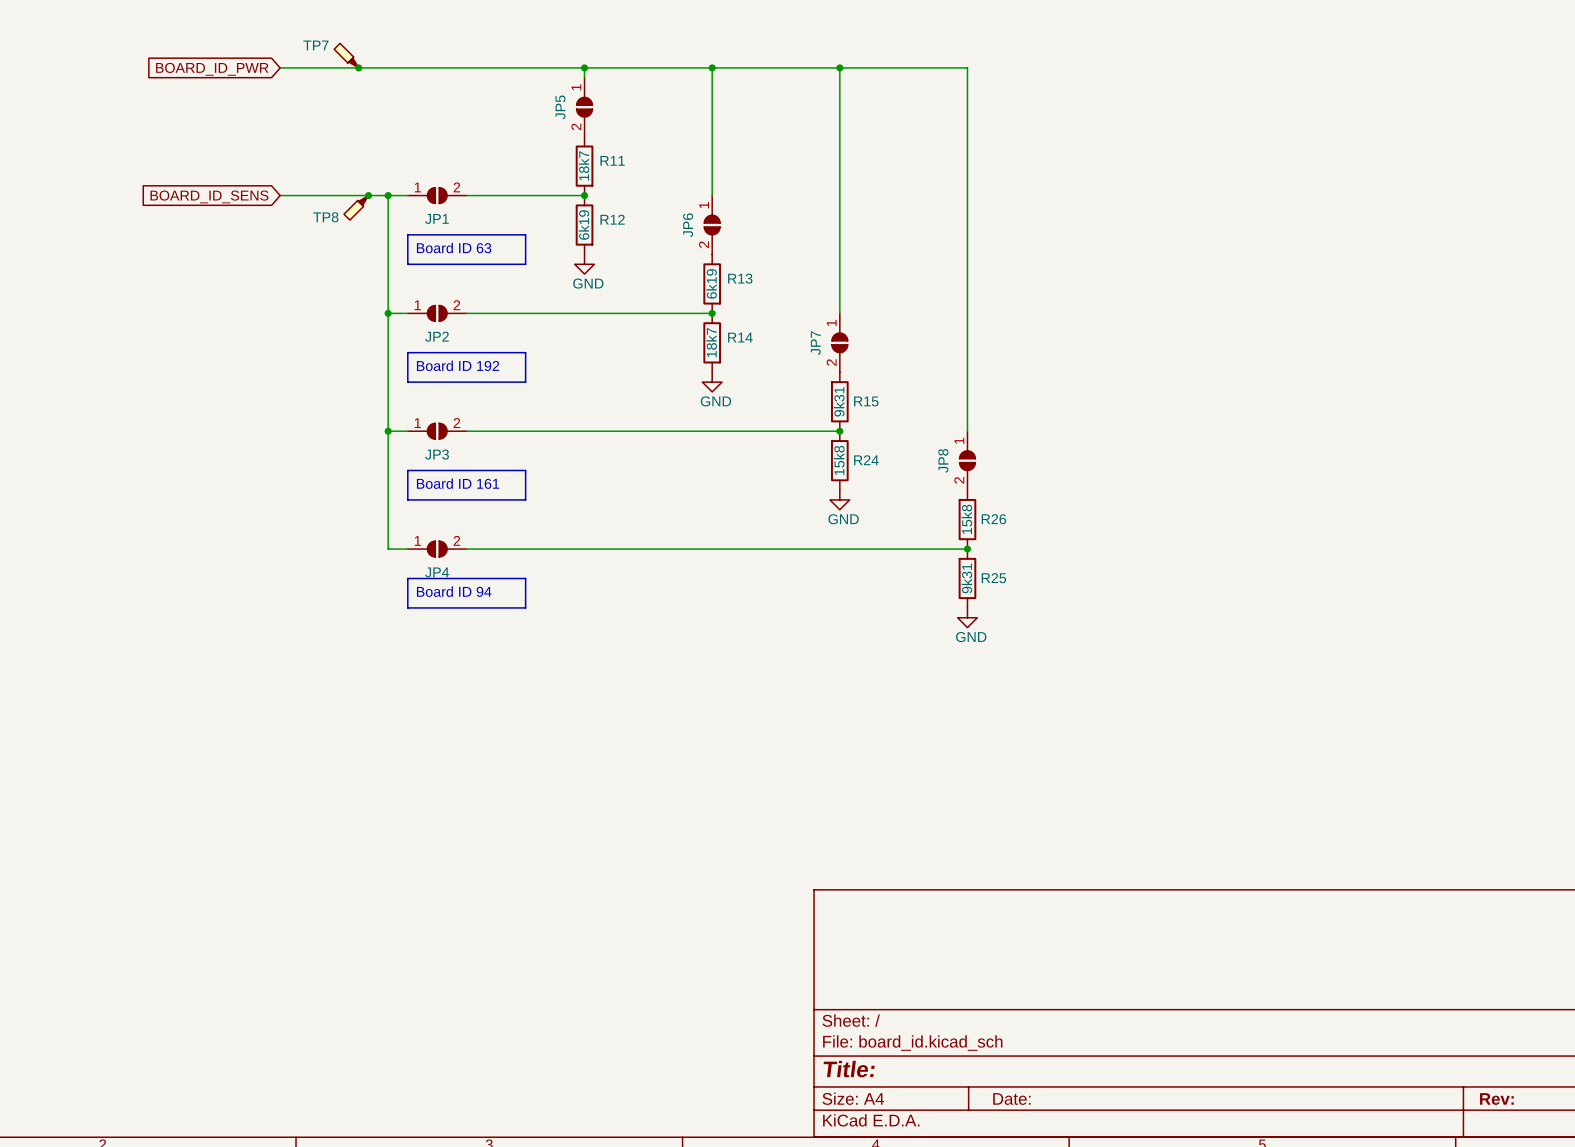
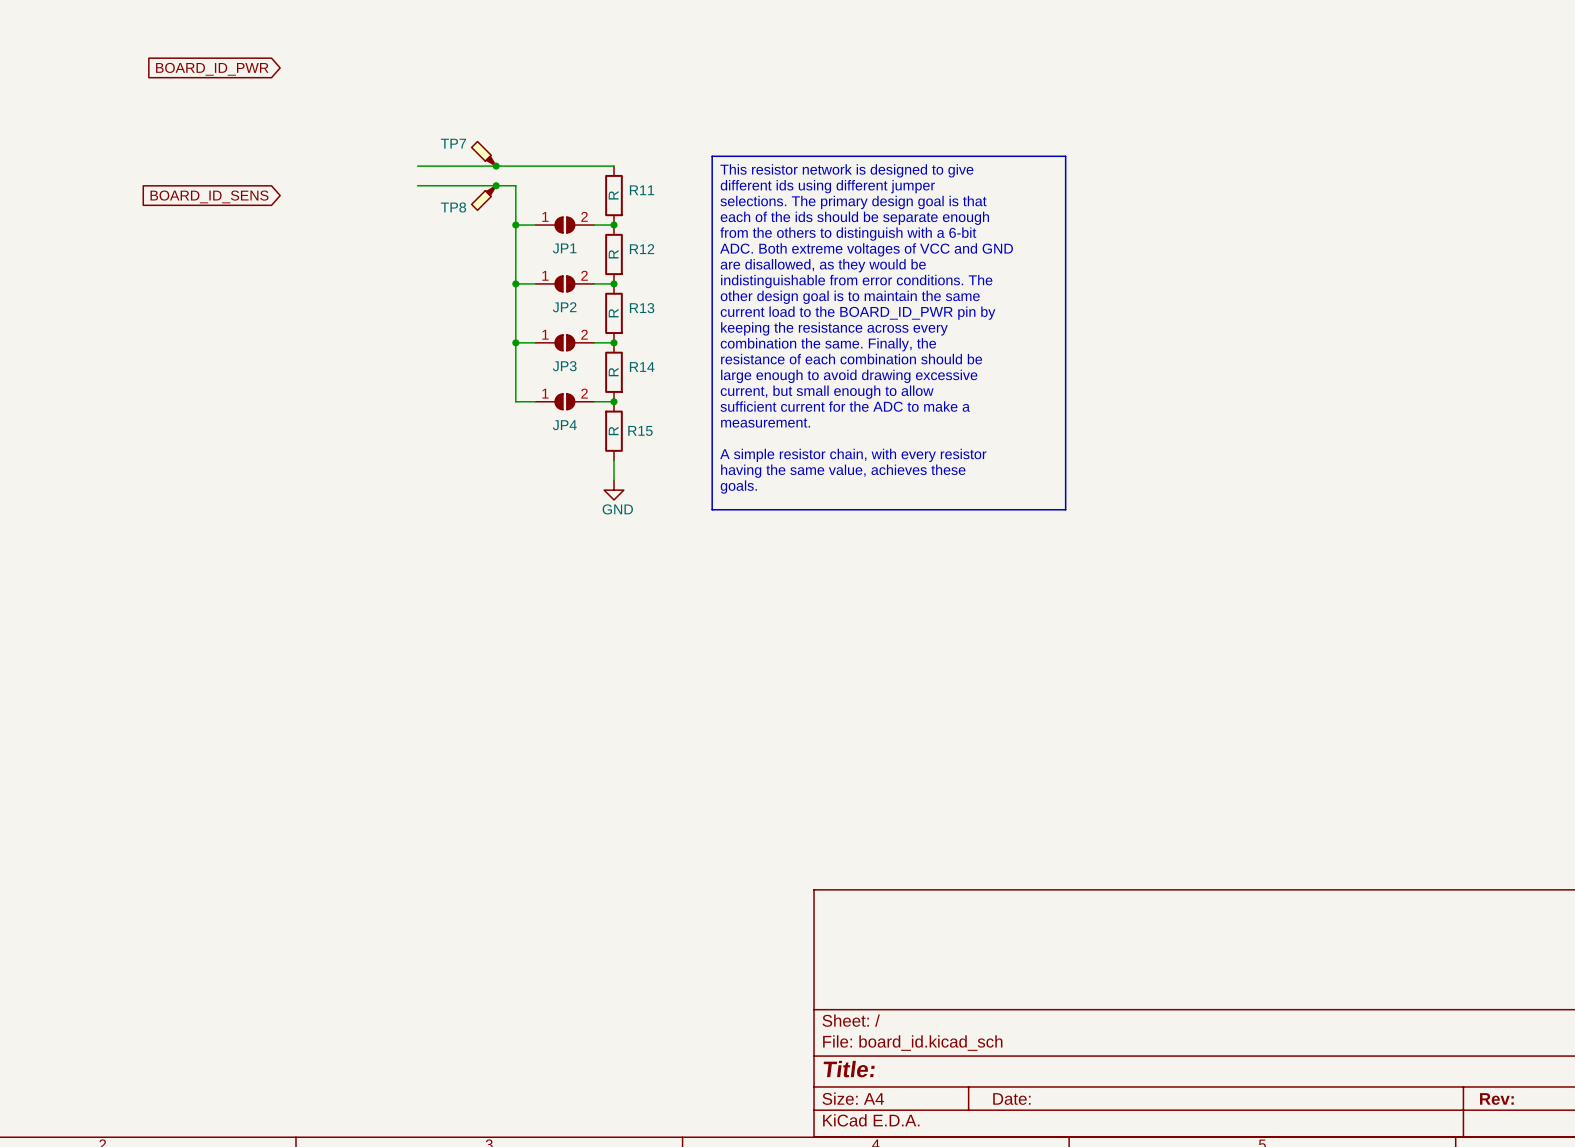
TP7 position: (346, 55) -> (483, 153)
wire: (280, 67) (967, 67) (967, 431) -> none
junction: (358, 67) -> none
wire: (584, 67) (584, 77) -> none
junction: (584, 67) -> none
wire: (712, 67) (712, 195) -> none
junction: (712, 67) -> none
wire: (839, 67) (839, 313) -> none
junction: (839, 67) -> none
JP5: (584, 107) -> none
line: none -> (712, 156) (1065, 156) (1065, 509) (712, 509) (712, 156)
R11 value: 18k7 (583, 165) -> R (613, 195)
wire: none -> (417, 166) (613, 166)
junction: none -> (496, 166)
R11 position: (584, 166) -> (613, 195)
text: none -> This resistor network is designed to give (846, 170)
wire: none -> (417, 185) (515, 185) (515, 401) (535, 401)
junction: none -> (496, 185)
text: none -> different ids using different jumper (827, 186)
wire: (280, 195) (407, 195) -> none
junction: (368, 195) -> none
wire: (388, 195) (388, 549) (407, 549) -> none
junction: (388, 195) -> none
JP1 position: (437, 195) -> (564, 225)
wire: (466, 195) (584, 195) -> none
junction: (584, 195) -> none
text: none -> selections. The primary design goal is that (853, 202)
TP8 position: (356, 207) -> (483, 198)
text: none -> each of the ids should be separate enough (854, 218)
junction: none -> (515, 225)
R12 value: 6k19 (583, 225) -> R (613, 254)
R12 position: (584, 225) -> (613, 254)
wire: none -> (594, 225) (613, 225)
junction: none -> (613, 225)
JP6: (712, 225) -> none
line: (407, 234) (525, 234) (525, 264) (407, 264) (407, 234) -> none
text: none -> from the others to distinguish with a 6-bit (848, 234)
text: Board ID 63 (454, 247) -> none
text: none -> ADC. Both extreme voltages of VCC and GND (866, 249)
power symbol: GND (584, 264) -> none
text: none -> are disallowed, as they would be (823, 265)
text: none -> indistinguishable from error conditions. The (856, 281)
wire: none -> (515, 283) (535, 283)
junction: none -> (515, 283)
wire: none -> (594, 283) (613, 283)
junction: none -> (613, 283)
R13 value: 6k19 (711, 283) -> R (613, 313)
R13 position: (712, 283) -> (613, 313)
text: none -> other design goal is to maintain the same (850, 297)
wire: (388, 313) (407, 313) -> (515, 225) (535, 225)
junction: (388, 313) -> none
JP2 position: (437, 313) -> (564, 283)
wire: (466, 313) (712, 313) -> none
junction: (712, 313) -> none
text: none -> current load to the BOARD_ID_PWR pin by (858, 313)
text: none -> keeping the resistance across every (834, 328)
junction: none -> (515, 342)
wire: none -> (594, 342) (613, 342)
junction: none -> (613, 342)
R14 value: 18k7 (711, 342) -> R (613, 372)
R14 position: (712, 342) -> (613, 372)
JP7: (839, 342) -> none
text: none -> combination the same. Finally, the (828, 344)
line: (407, 352) (407, 382) (525, 382) (525, 352) (407, 352) -> none
text: none -> resistance of each combination should be (851, 359)
text: Board ID 192 (458, 365) -> none
text: none -> large enough to avoid drawing excessive (849, 376)
power symbol: GND (712, 382) -> none
text: none -> current, but small enough to allow (827, 392)
wire: none -> (594, 401) (613, 401)
junction: none -> (613, 401)
R15 position: (839, 401) -> (613, 431)
R15 value: 9k31 (839, 401) -> R (613, 430)
text: none -> sufficient current for the ADC to make a (845, 406)
text: none -> measurement. (765, 422)
wire: (388, 431) (407, 431) -> (515, 342) (535, 342)
junction: (388, 431) -> none
JP3 position: (437, 431) -> (564, 342)
wire: (466, 431) (839, 431) -> none
junction: (839, 431) -> none
text: none -> A simple resistor chain, with every resistor (853, 455)
wire: none -> (613, 460) (613, 480)
R24: 15k8 (839, 460) -> none
JP8: (967, 460) -> none
line: (407, 470) (407, 499) (525, 499) (525, 470) (407, 470) -> none
text: none -> having the same value, achieves these (843, 471)
text: Board ID 161 (458, 483) -> none
text: none -> goals. (738, 487)
power symbol: none -> GND (613, 490)
power symbol: GND (839, 499) -> none
R26: 15k8 (967, 519) -> none
JP4 position: (437, 549) -> (564, 401)
wire: (466, 549) (967, 549) -> none
junction: (967, 549) -> none
line: (407, 578) (407, 607) (525, 607) (525, 578) (407, 578) -> none
R25: 9k31 (967, 578) -> none
text: Board ID 94 (454, 591) -> none
power symbol: GND (967, 617) -> none

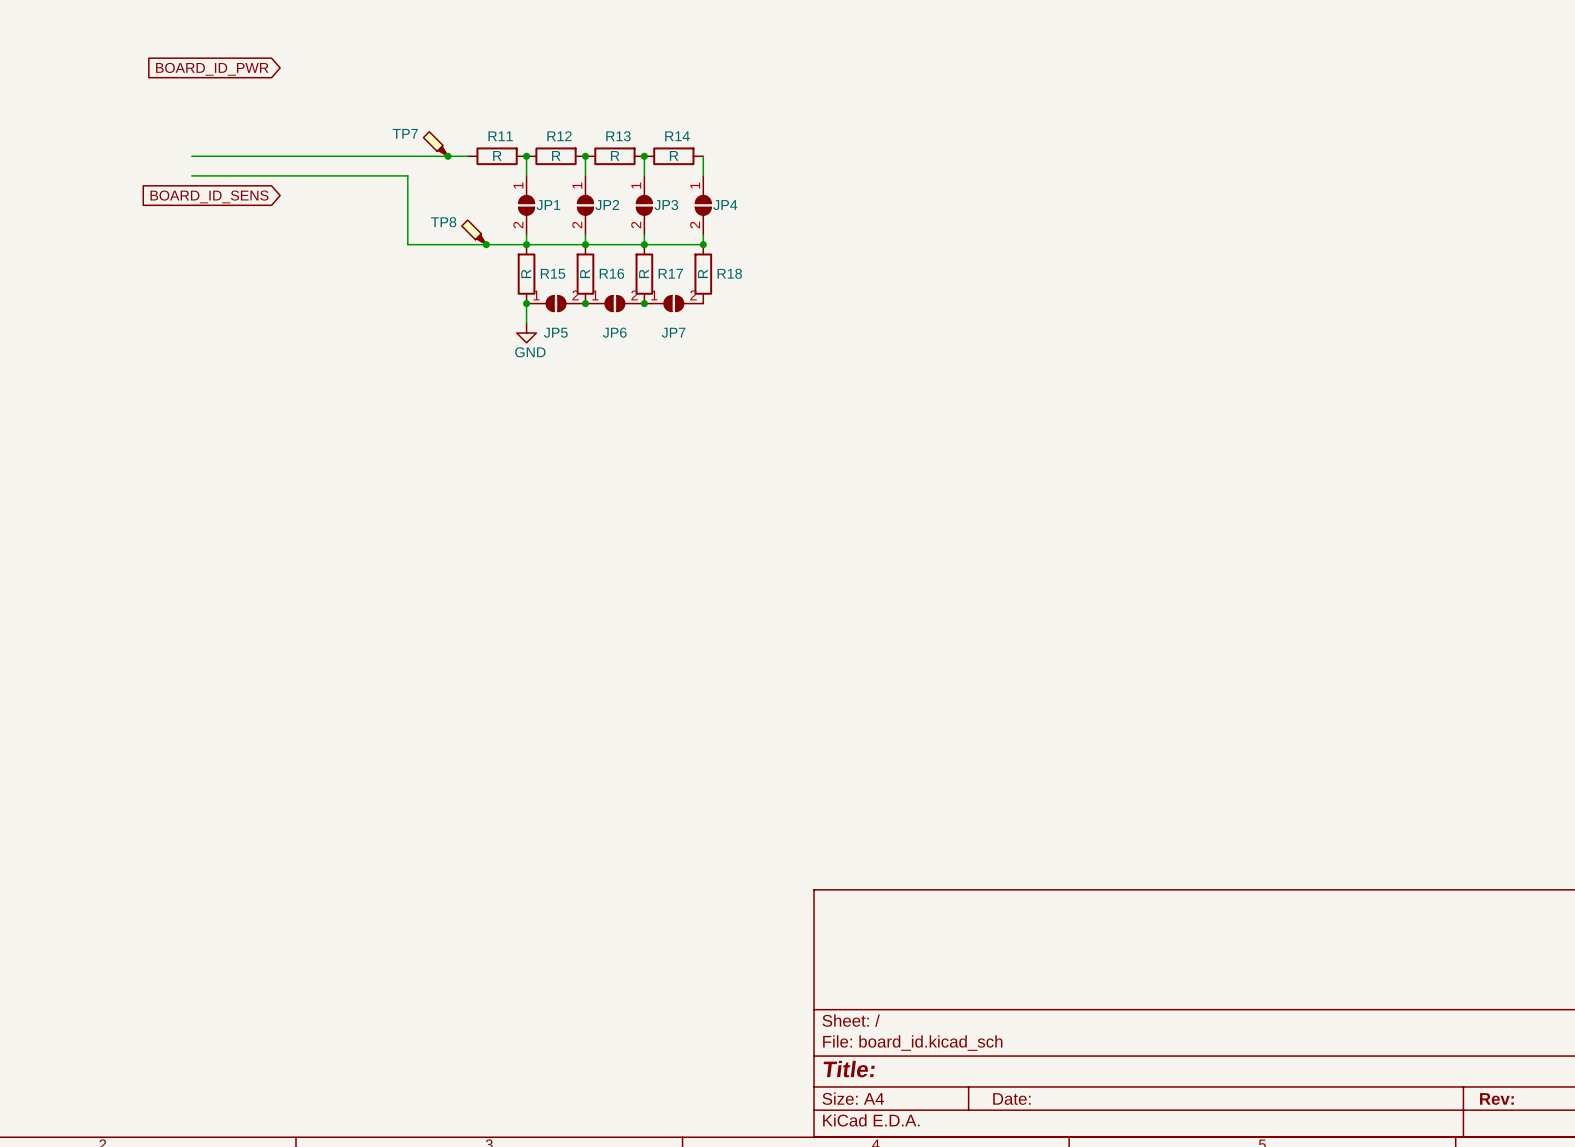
TP7 position: (483, 153) -> (435, 144)
wire: none -> (191, 156) (467, 156)
junction: none -> (448, 156)
wire: none -> (526, 156) (526, 175)
junction: none -> (526, 156)
wire: none -> (585, 156) (585, 175)
junction: none -> (585, 156)
wire: none -> (644, 156) (644, 175)
junction: none -> (644, 156)
wire: none -> (703, 156) (703, 175)
line: (712, 156) (1065, 156) (1065, 509) (712, 509) (712, 156) -> none
wire: (417, 166) (613, 166) -> none
junction: (496, 166) -> none
text: This resistor network is designed to give (846, 170) -> none
wire: none -> (191, 175) (407, 175) (407, 244) (703, 244) (703, 234)
wire: (417, 185) (515, 185) (515, 401) (535, 401) -> none
junction: (496, 185) -> none
text: different ids using different jumper (827, 186) -> none
R11 name position: R11 (642, 190) -> R11 (500, 136)
R11 rotation: 0° (613, 195) -> 90° clockwise (497, 156)
R11 position: (613, 195) -> (497, 156)
TP8 rotation: 0° (483, 198) -> 90° clockwise (474, 232)
TP8 position: (483, 198) -> (474, 232)
text: selections. The primary design goal is that (853, 202) -> none
TP8 name position: TP8 (453, 207) -> TP8 (443, 222)
text: each of the ids should be separate enough (854, 218) -> none
wire: (515, 225) (535, 225) -> none
junction: (515, 225) -> none
JP1 rotation: 0° (564, 225) -> 90° clockwise (526, 205)
JP1 position: (564, 225) -> (526, 205)
wire: (594, 225) (613, 225) -> none
junction: (613, 225) -> none
wire: none -> (526, 234) (526, 244)
wire: none -> (585, 234) (585, 244)
wire: none -> (644, 234) (644, 244)
text: from the others to distinguish with a 6-bit (848, 234) -> none
junction: none -> (486, 244)
junction: none -> (526, 244)
junction: none -> (585, 244)
junction: none -> (644, 244)
junction: none -> (703, 244)
JP1 name position: JP1 (564, 248) -> JP1 (548, 205)
R12 name position: R12 (642, 249) -> R12 (559, 136)
text: ADC. Both extreme voltages of VCC and GND (866, 249) -> none
R12 rotation: 0° (613, 254) -> 90° clockwise (556, 156)
R12 position: (613, 254) -> (556, 156)
text: are disallowed, as they would be (823, 265) -> none
R16: none -> R (585, 274)
R17: none -> R (644, 274)
R18: none -> R (703, 274)
text: indistinguishable from error conditions. The (856, 281) -> none
wire: (515, 283) (535, 283) -> none
junction: (515, 283) -> none
JP2 rotation: 0° (564, 283) -> 90° clockwise (585, 205)
JP2 position: (564, 283) -> (585, 205)
wire: (594, 283) (613, 283) -> none
junction: (613, 283) -> none
text: other design goal is to maintain the same (850, 297) -> none
junction: none -> (526, 303)
JP5: none -> (556, 303)
junction: none -> (585, 303)
JP6: none -> (614, 303)
junction: none -> (644, 303)
JP7: none -> (673, 303)
JP2 name position: JP2 (564, 307) -> JP2 (607, 205)
R13 name position: R13 (642, 308) -> R13 (618, 136)
R13 rotation: 0° (613, 313) -> 90° clockwise (614, 156)
R13 position: (613, 313) -> (614, 156)
text: current load to the BOARD_ID_PWR pin by (858, 313) -> none
text: keeping the resistance across every (834, 328) -> none
wire: (515, 342) (535, 342) -> none
junction: (515, 342) -> none
JP3 rotation: 0° (564, 342) -> 90° clockwise (644, 205)
JP3 position: (564, 342) -> (644, 205)
wire: (594, 342) (613, 342) -> none
junction: (613, 342) -> none
text: combination the same. Finally, the (828, 344) -> none
text: resistance of each combination should be (851, 359) -> none
JP3 name position: JP3 (564, 366) -> JP3 (666, 205)
R14 name position: R14 (642, 367) -> R14 (677, 136)
R14 rotation: 0° (613, 372) -> 90° clockwise (673, 156)
R14 position: (613, 372) -> (673, 156)
text: large enough to avoid drawing excessive (849, 376) -> none
text: current, but small enough to allow (827, 392) -> none
JP4 rotation: 0° (564, 401) -> 90° clockwise (703, 205)
JP4 position: (564, 401) -> (703, 205)
wire: (594, 401) (613, 401) -> none
junction: (613, 401) -> none
text: sufficient current for the ADC to make a (845, 406) -> none
text: measurement. (765, 422) -> none
JP4 name position: JP4 (564, 425) -> JP4 (725, 205)
R15 position: (613, 431) -> (526, 274)
text: A simple resistor chain, with every resistor (853, 455) -> none
wire: (613, 460) (613, 480) -> (526, 303) (526, 323)
text: having the same value, achieves these (843, 471) -> none
text: goals. (738, 487) -> none
power symbol position: GND (613, 490) -> GND (526, 333)

